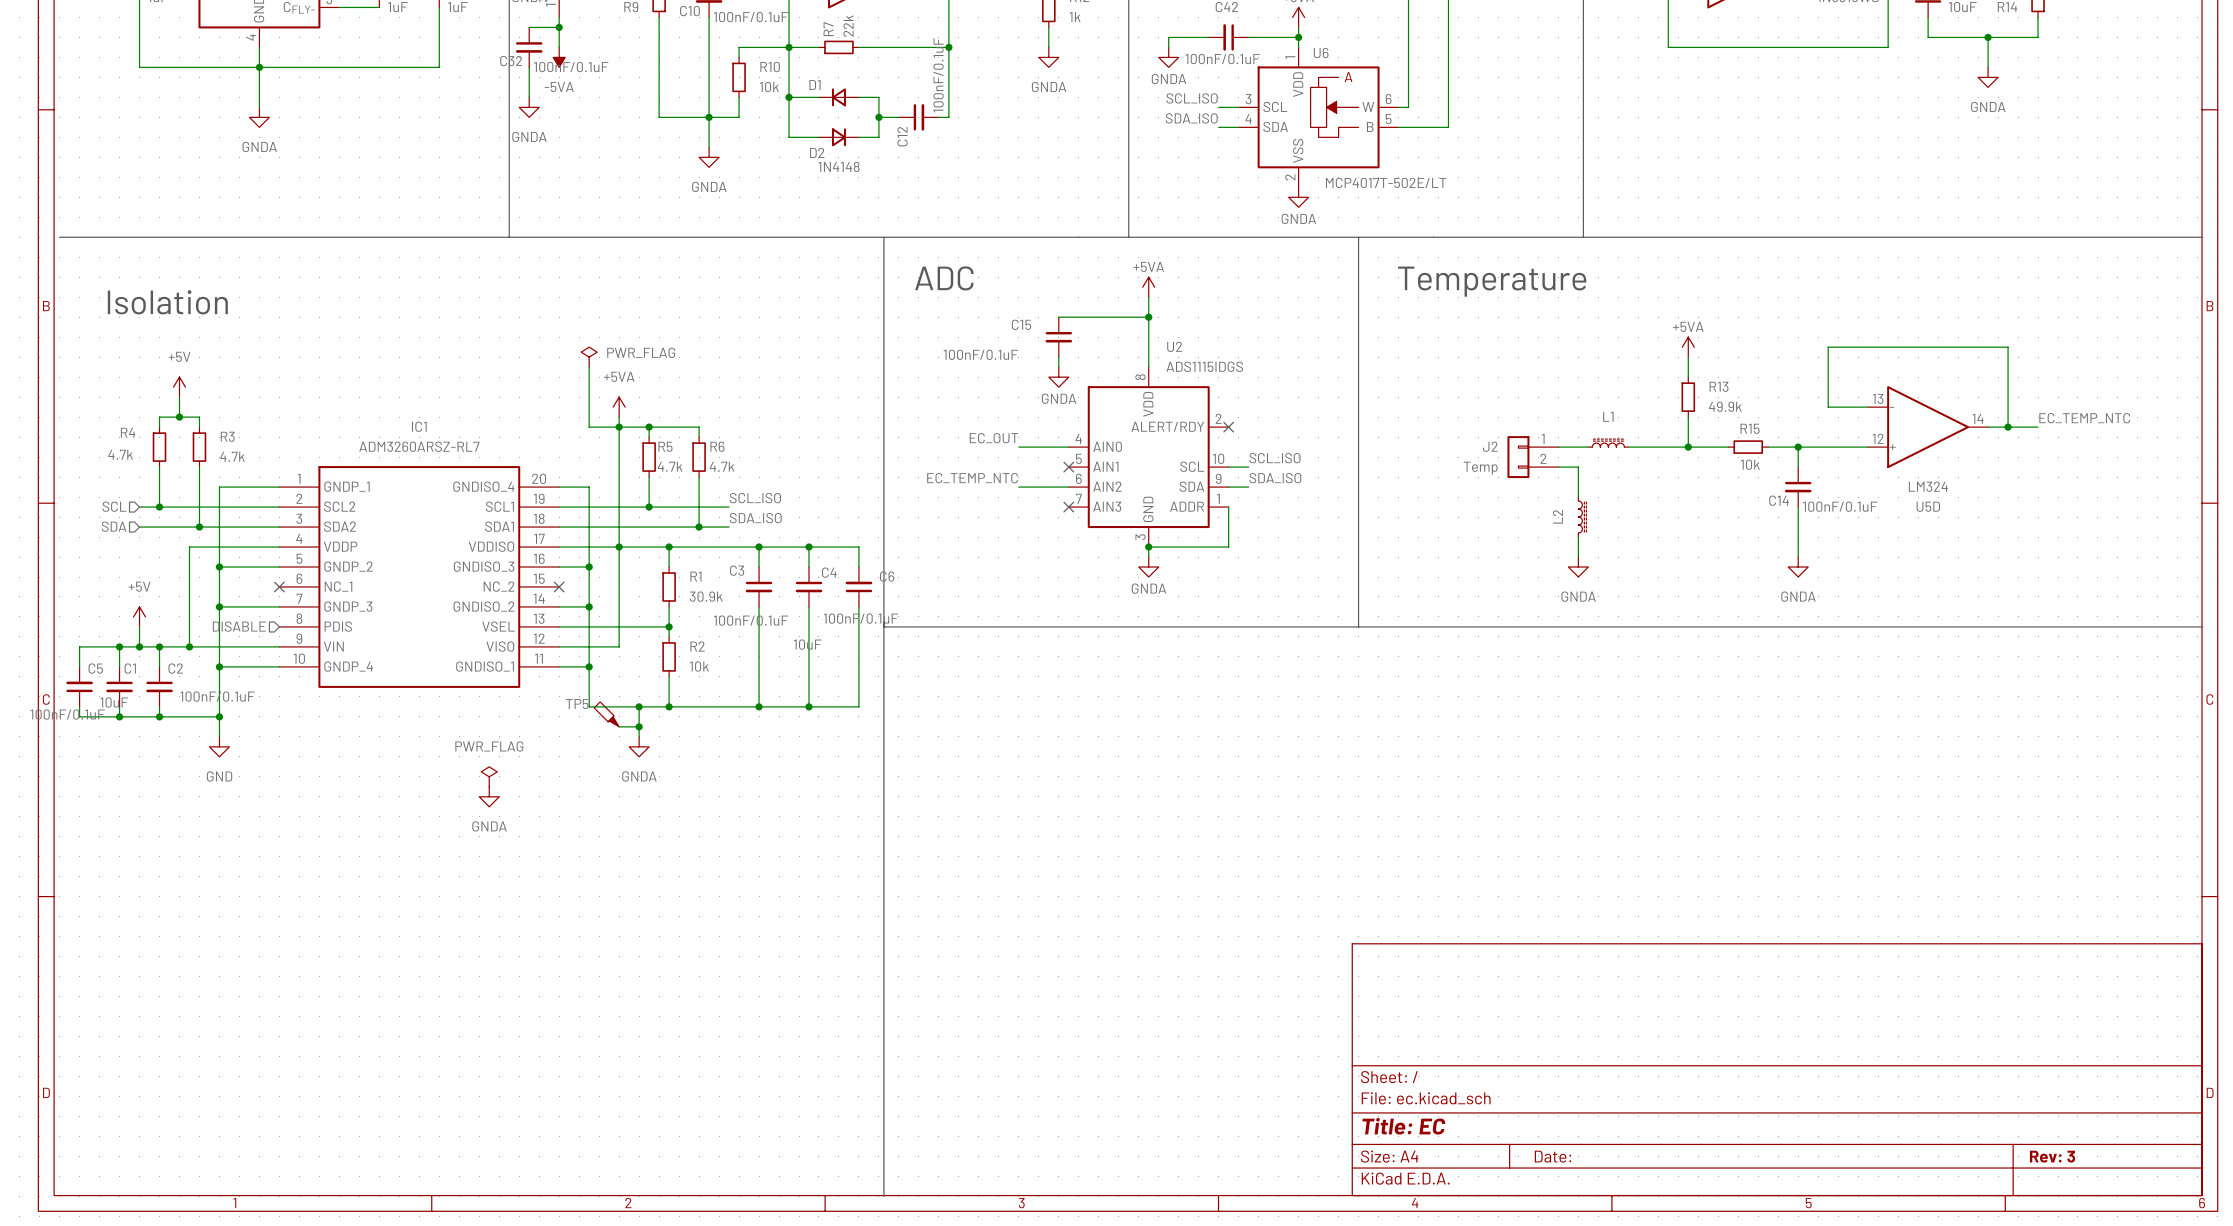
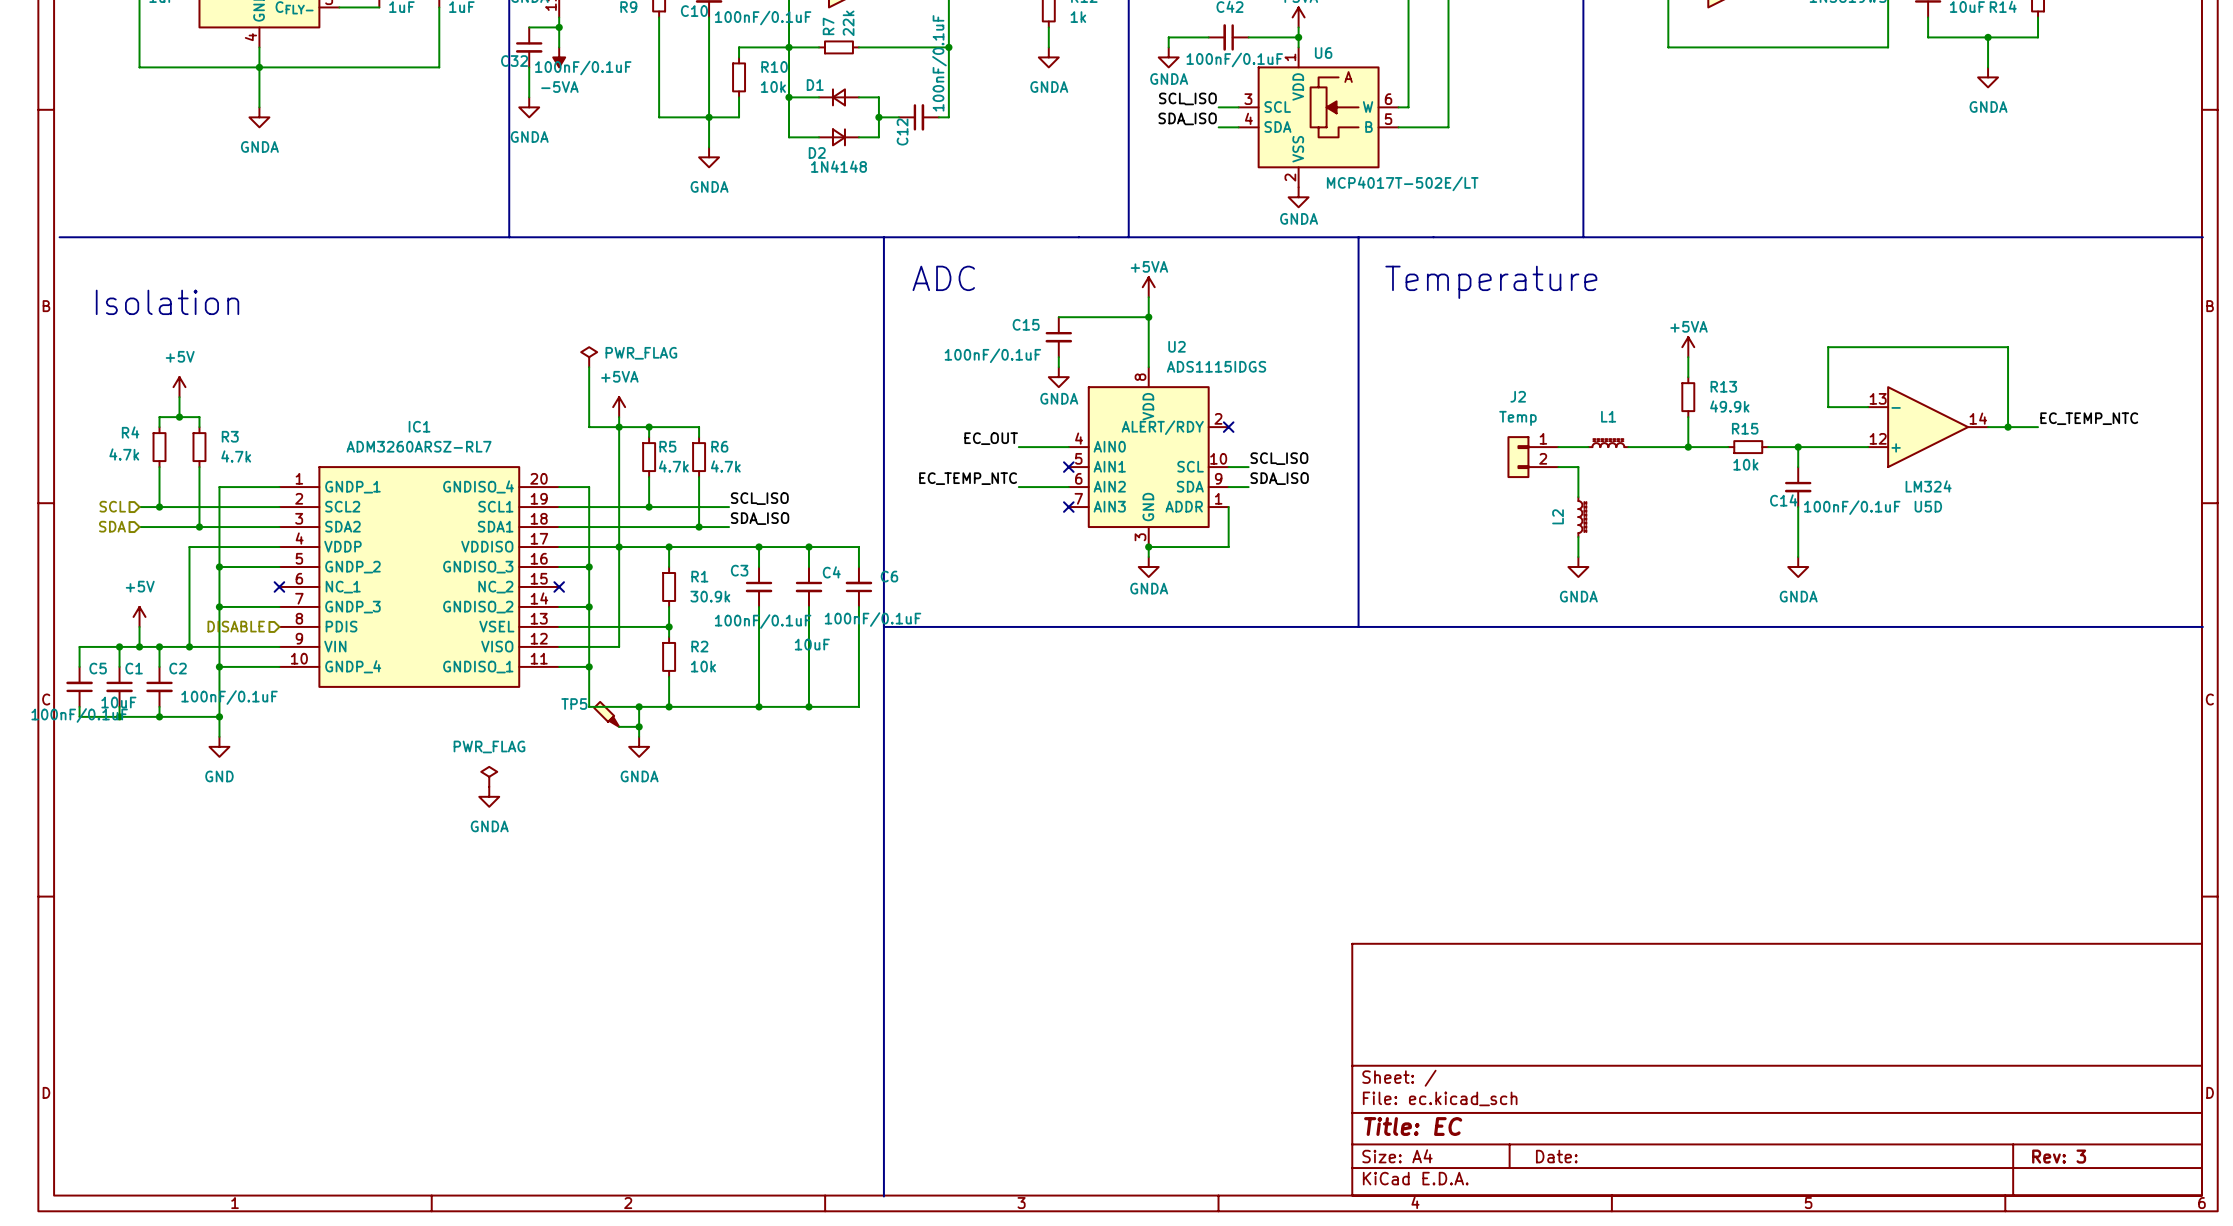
J2 text: none -> Temp (1517, 418)
J2 name position: J2 (1490, 446) -> J2 (1518, 396)
J2 value: Temp (1480, 468) -> none

